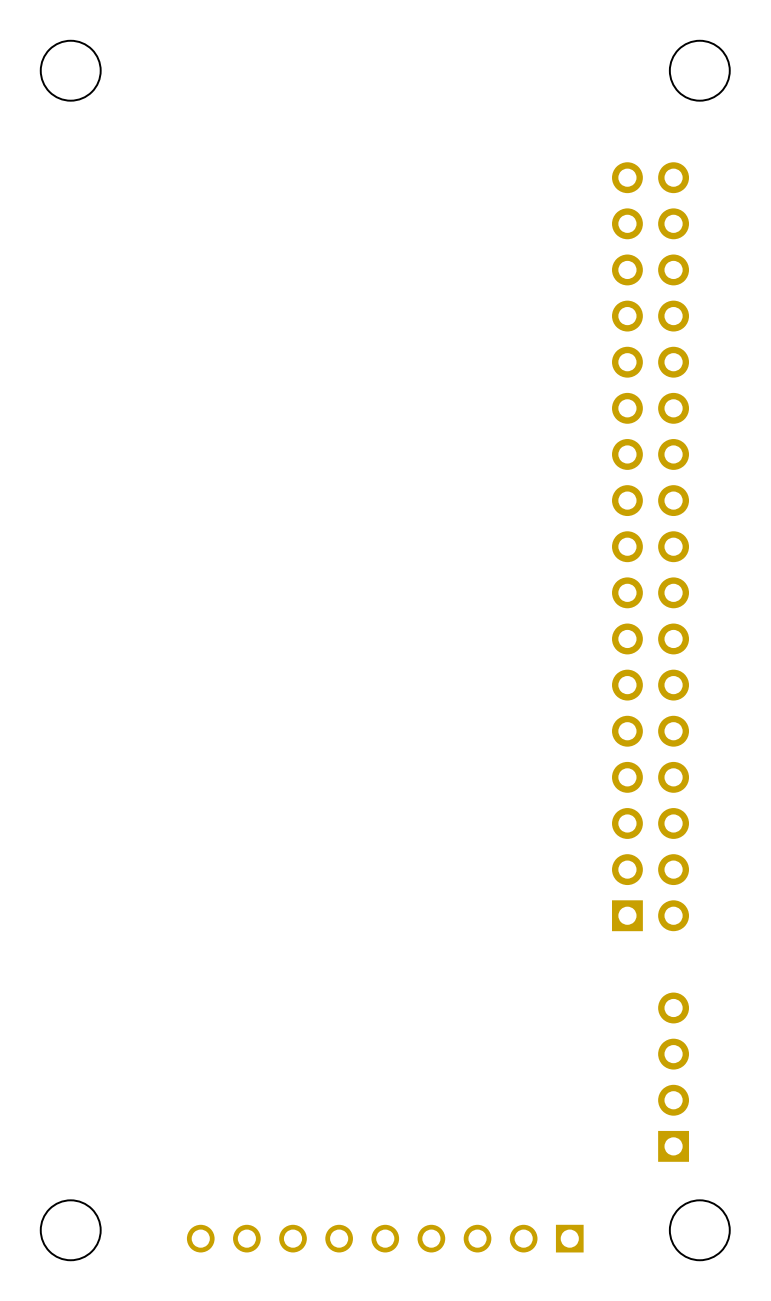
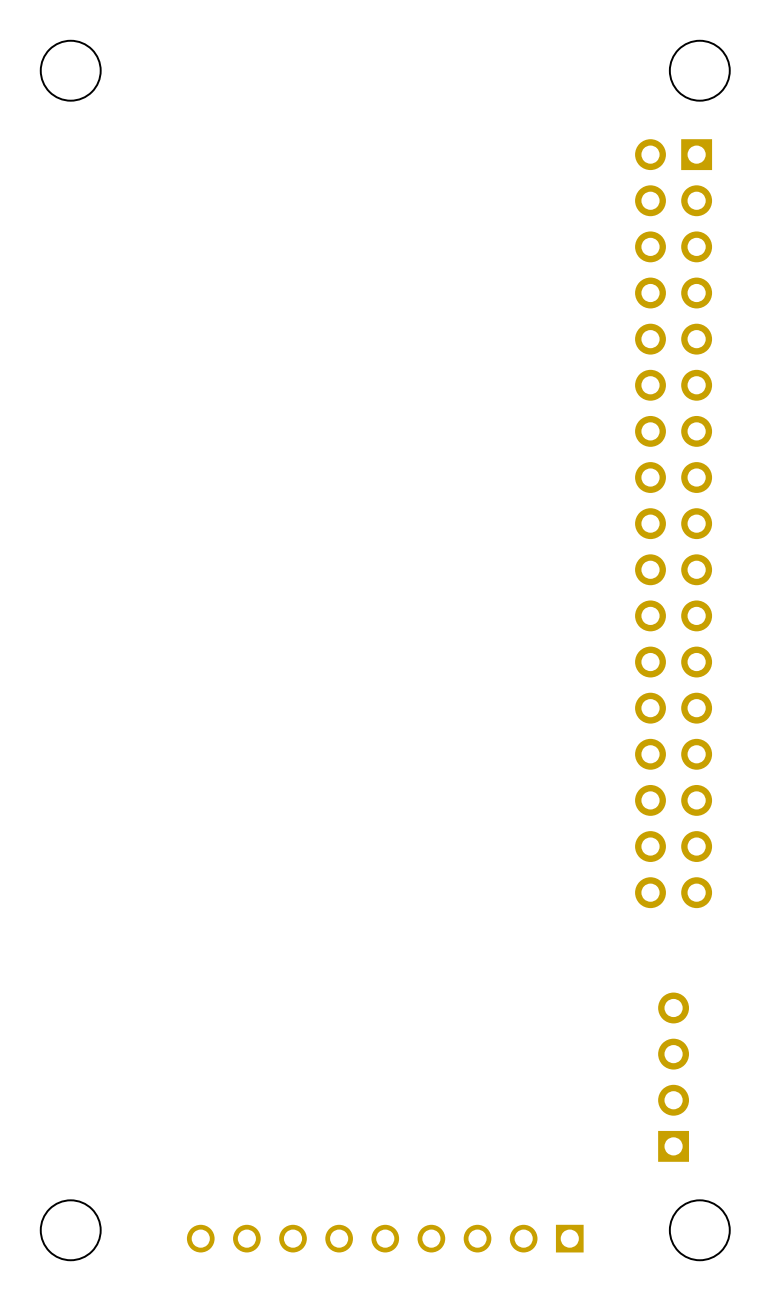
part rotation: 0° (650, 546) -> 180° (673, 523)

